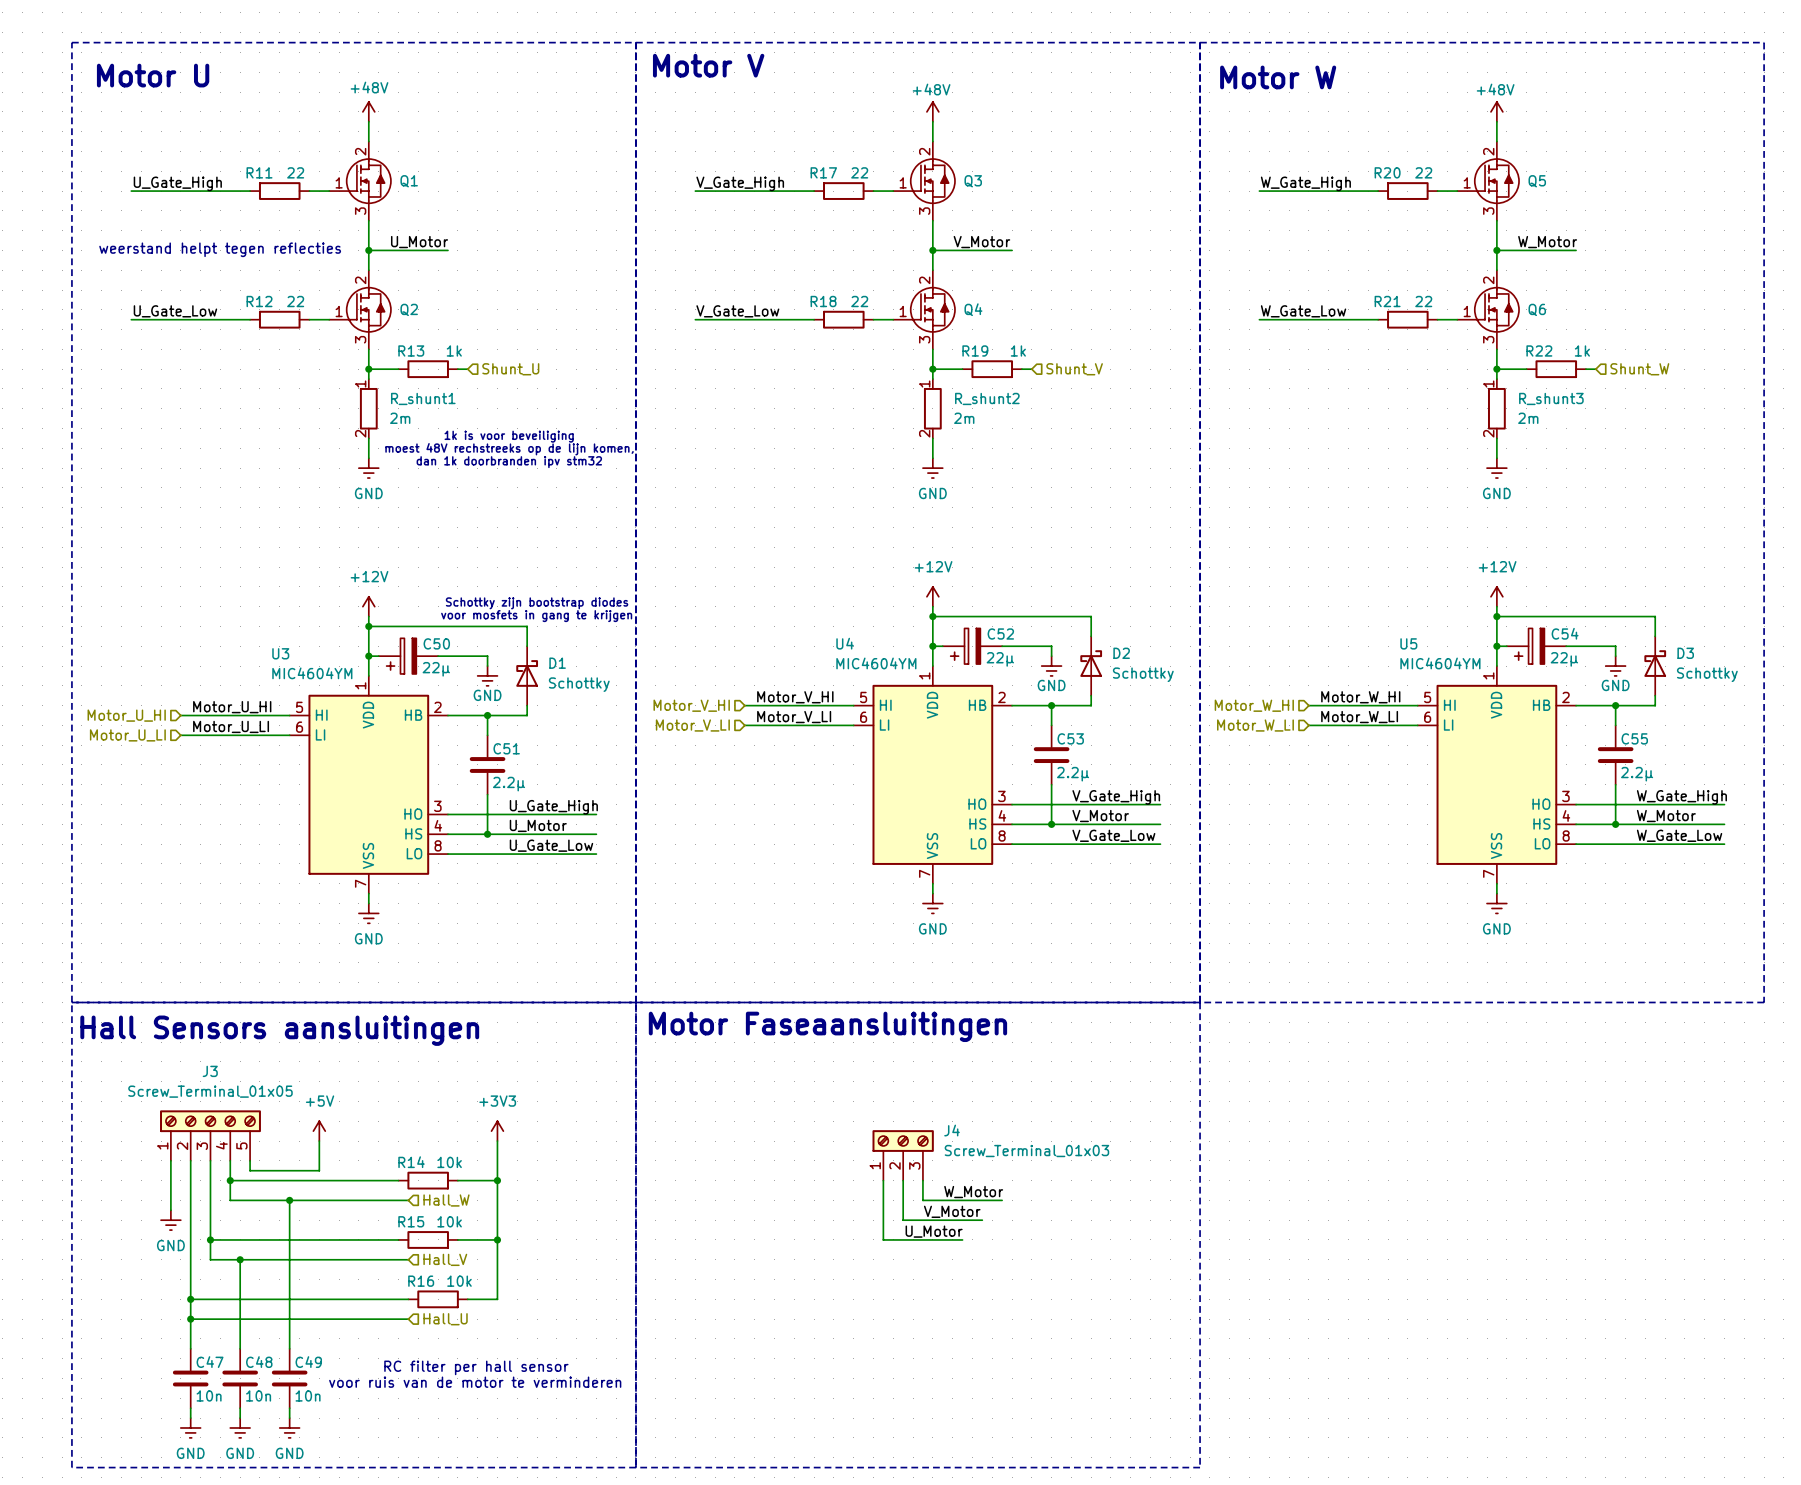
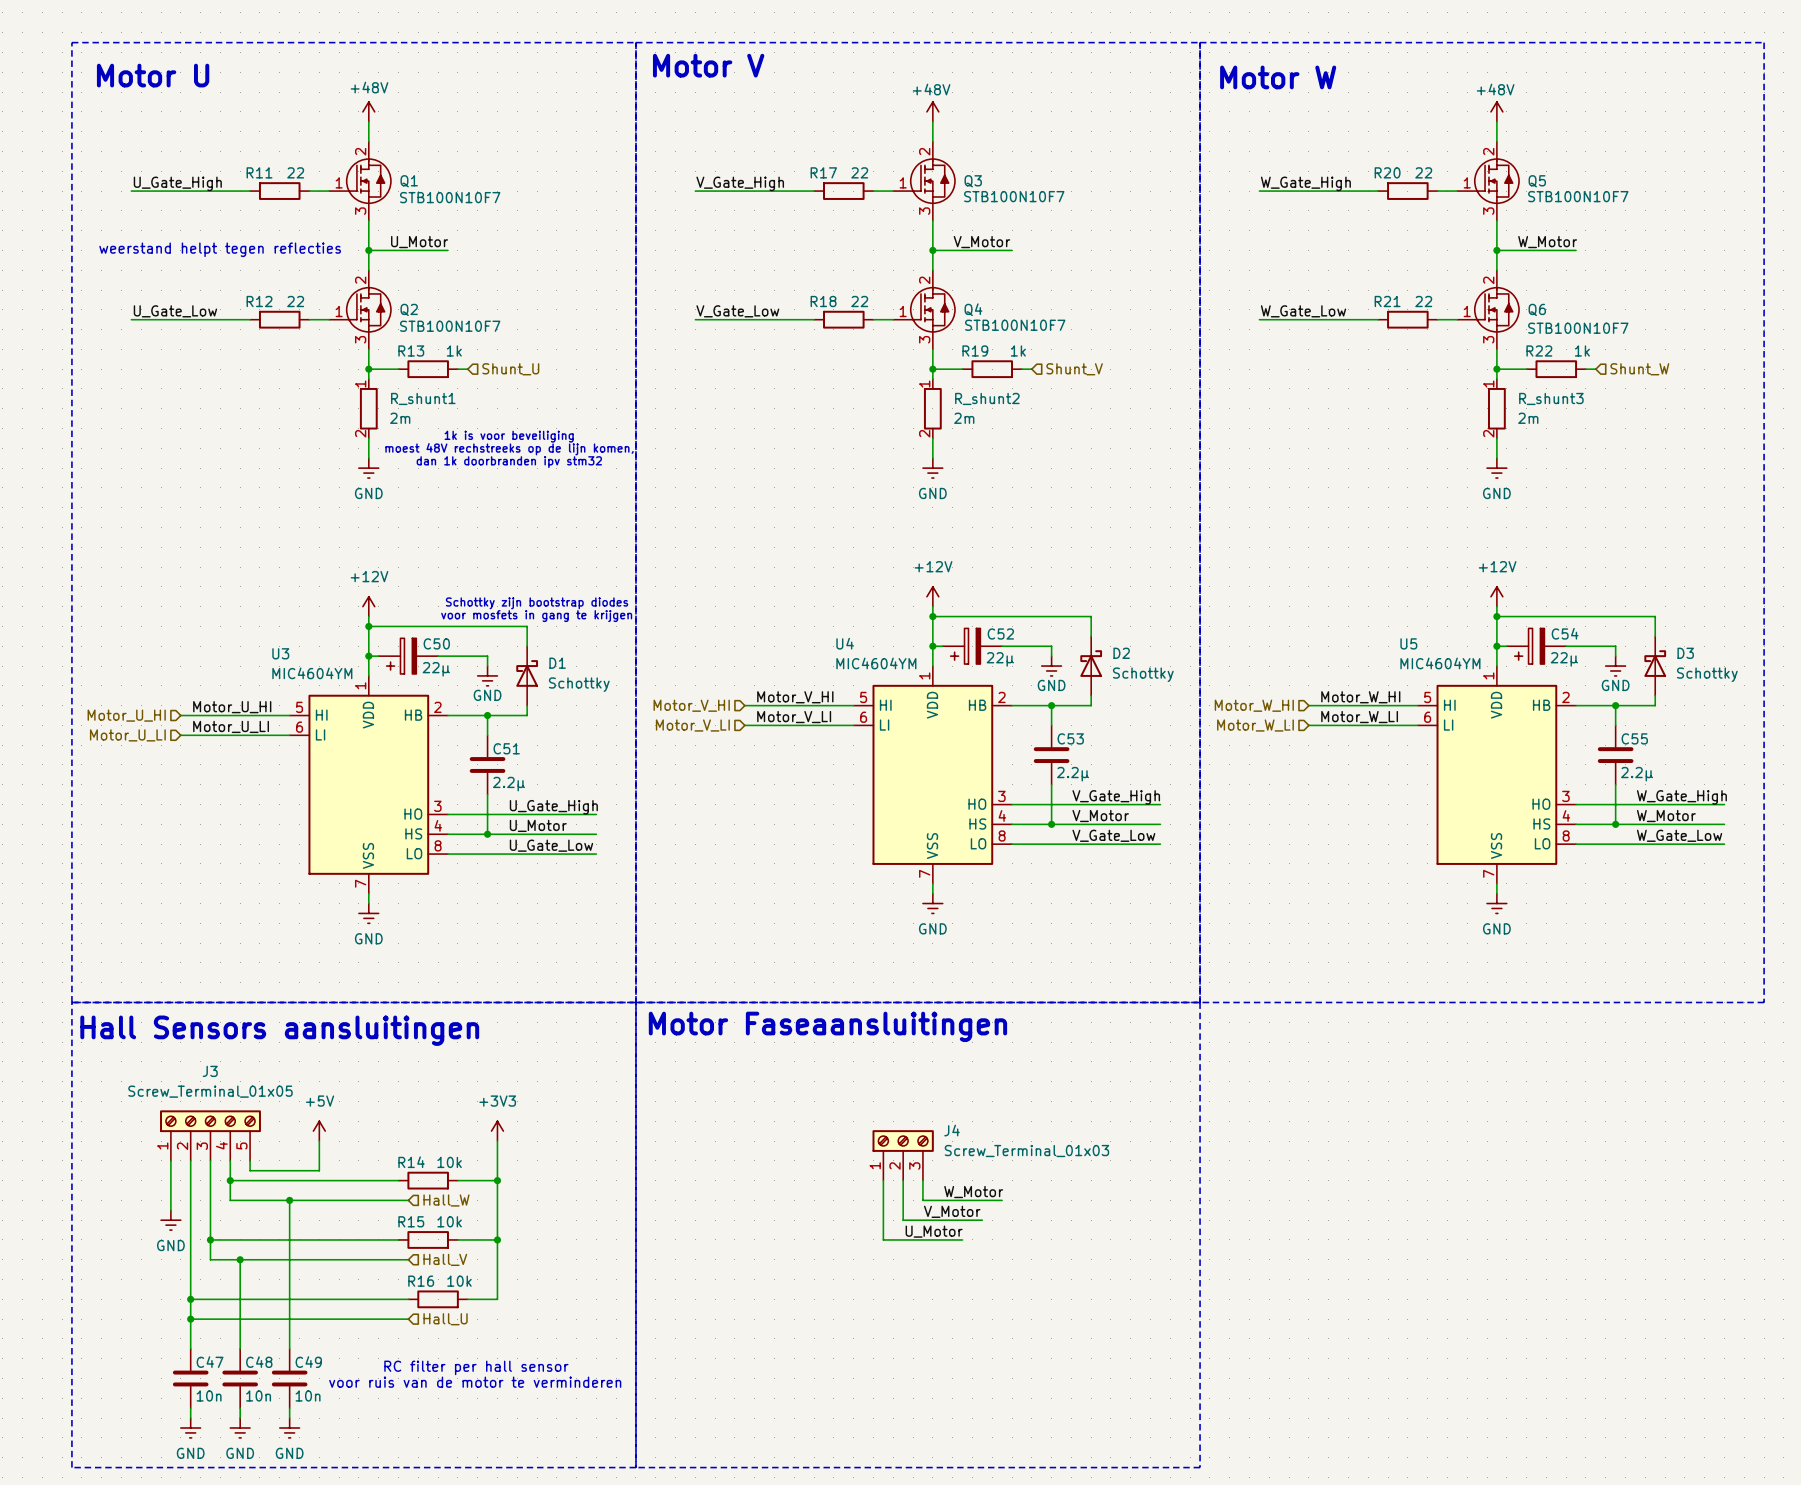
Q3 value: none -> STB100N10F7 (1014, 196)
Q5 value: none -> STB100N10F7 (1578, 196)
Q1 value: none -> STB100N10F7 (450, 197)
Q4 value: none -> STB100N10F7 (1015, 325)
Q2 value: none -> STB100N10F7 (450, 326)
Q6 value: none -> STB100N10F7 (1578, 328)

